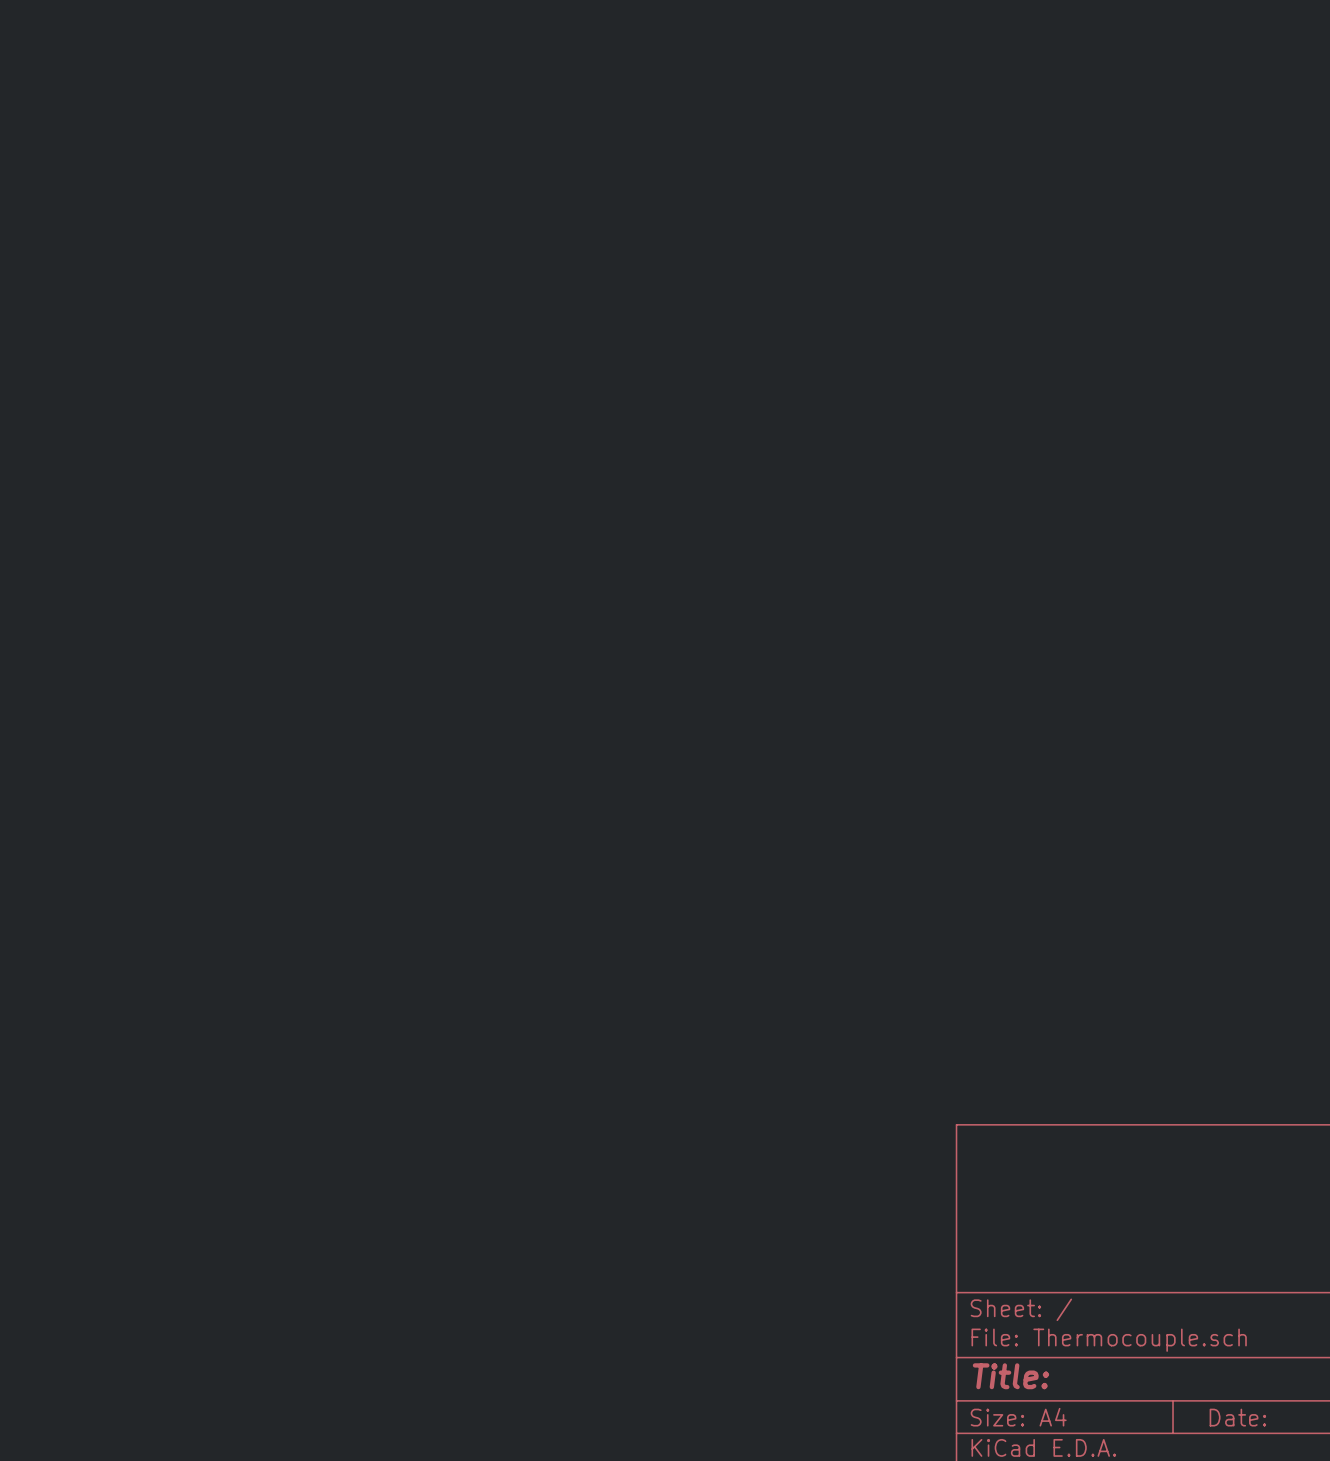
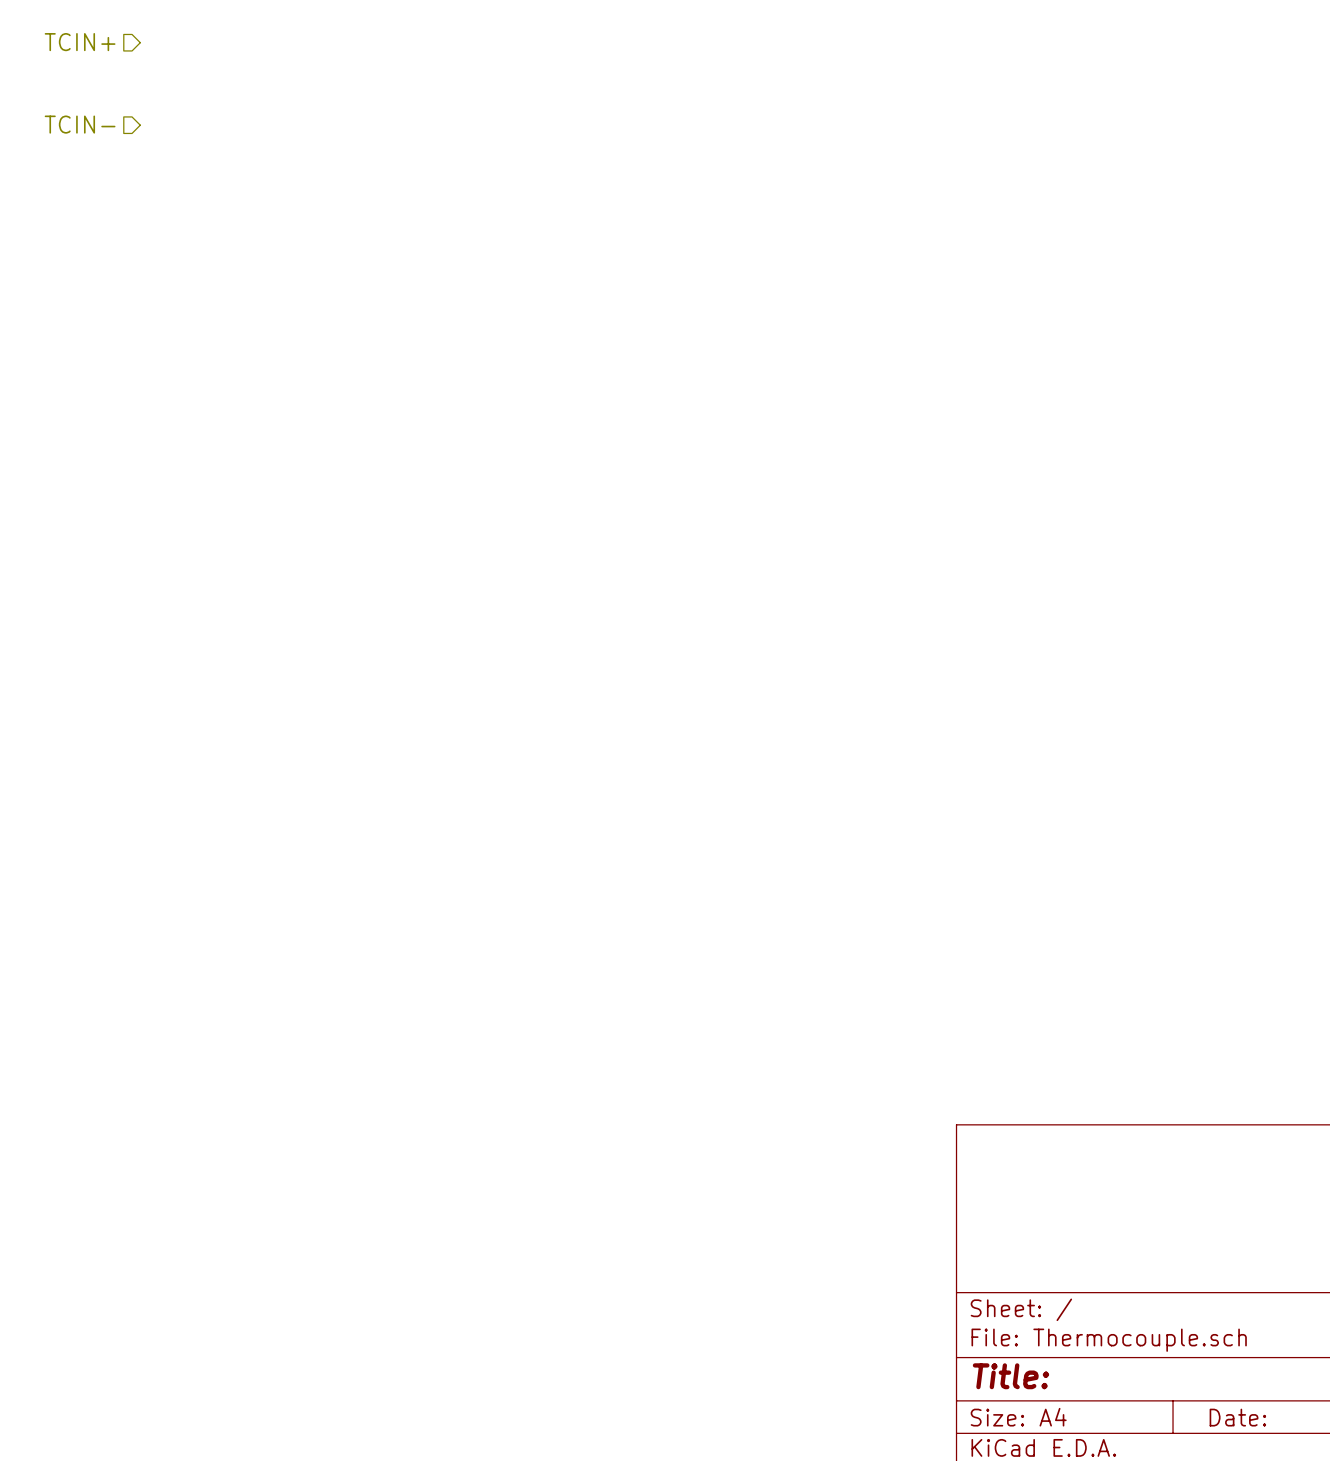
hierarchical label: none -> TCIN+ (80, 42)
hierarchical label: none -> TCIN- (80, 124)

